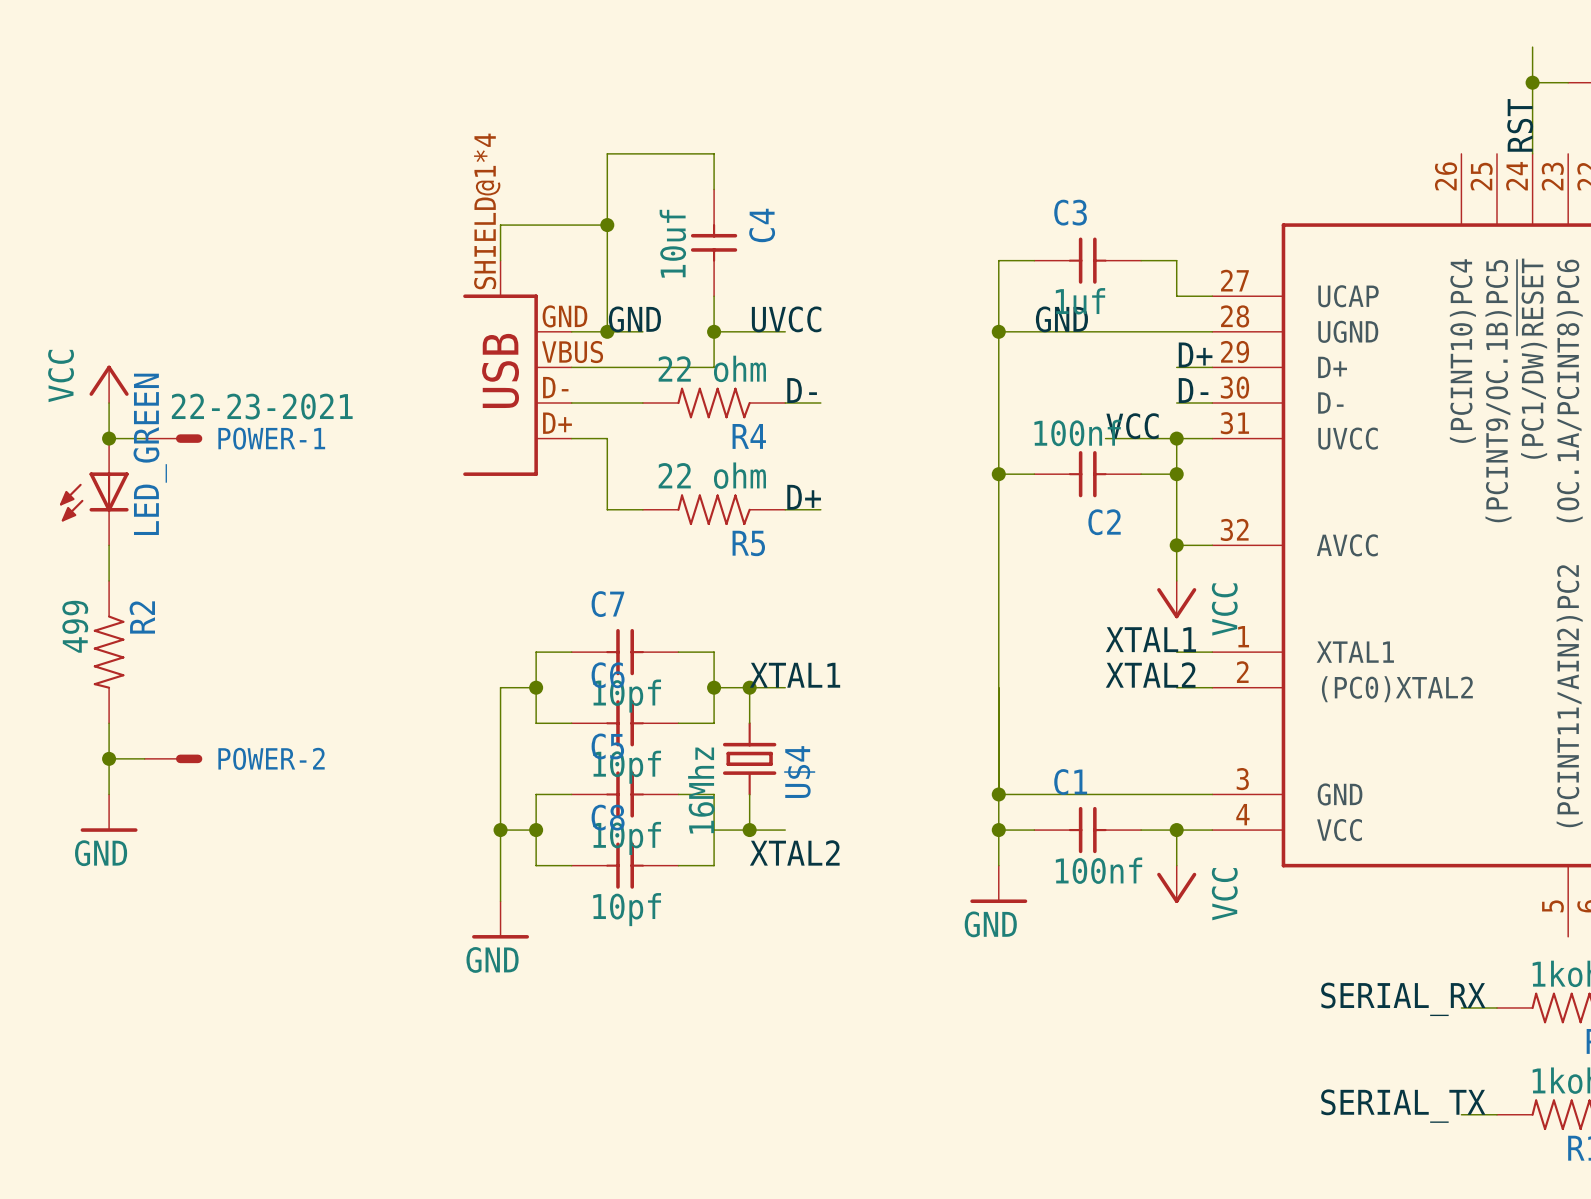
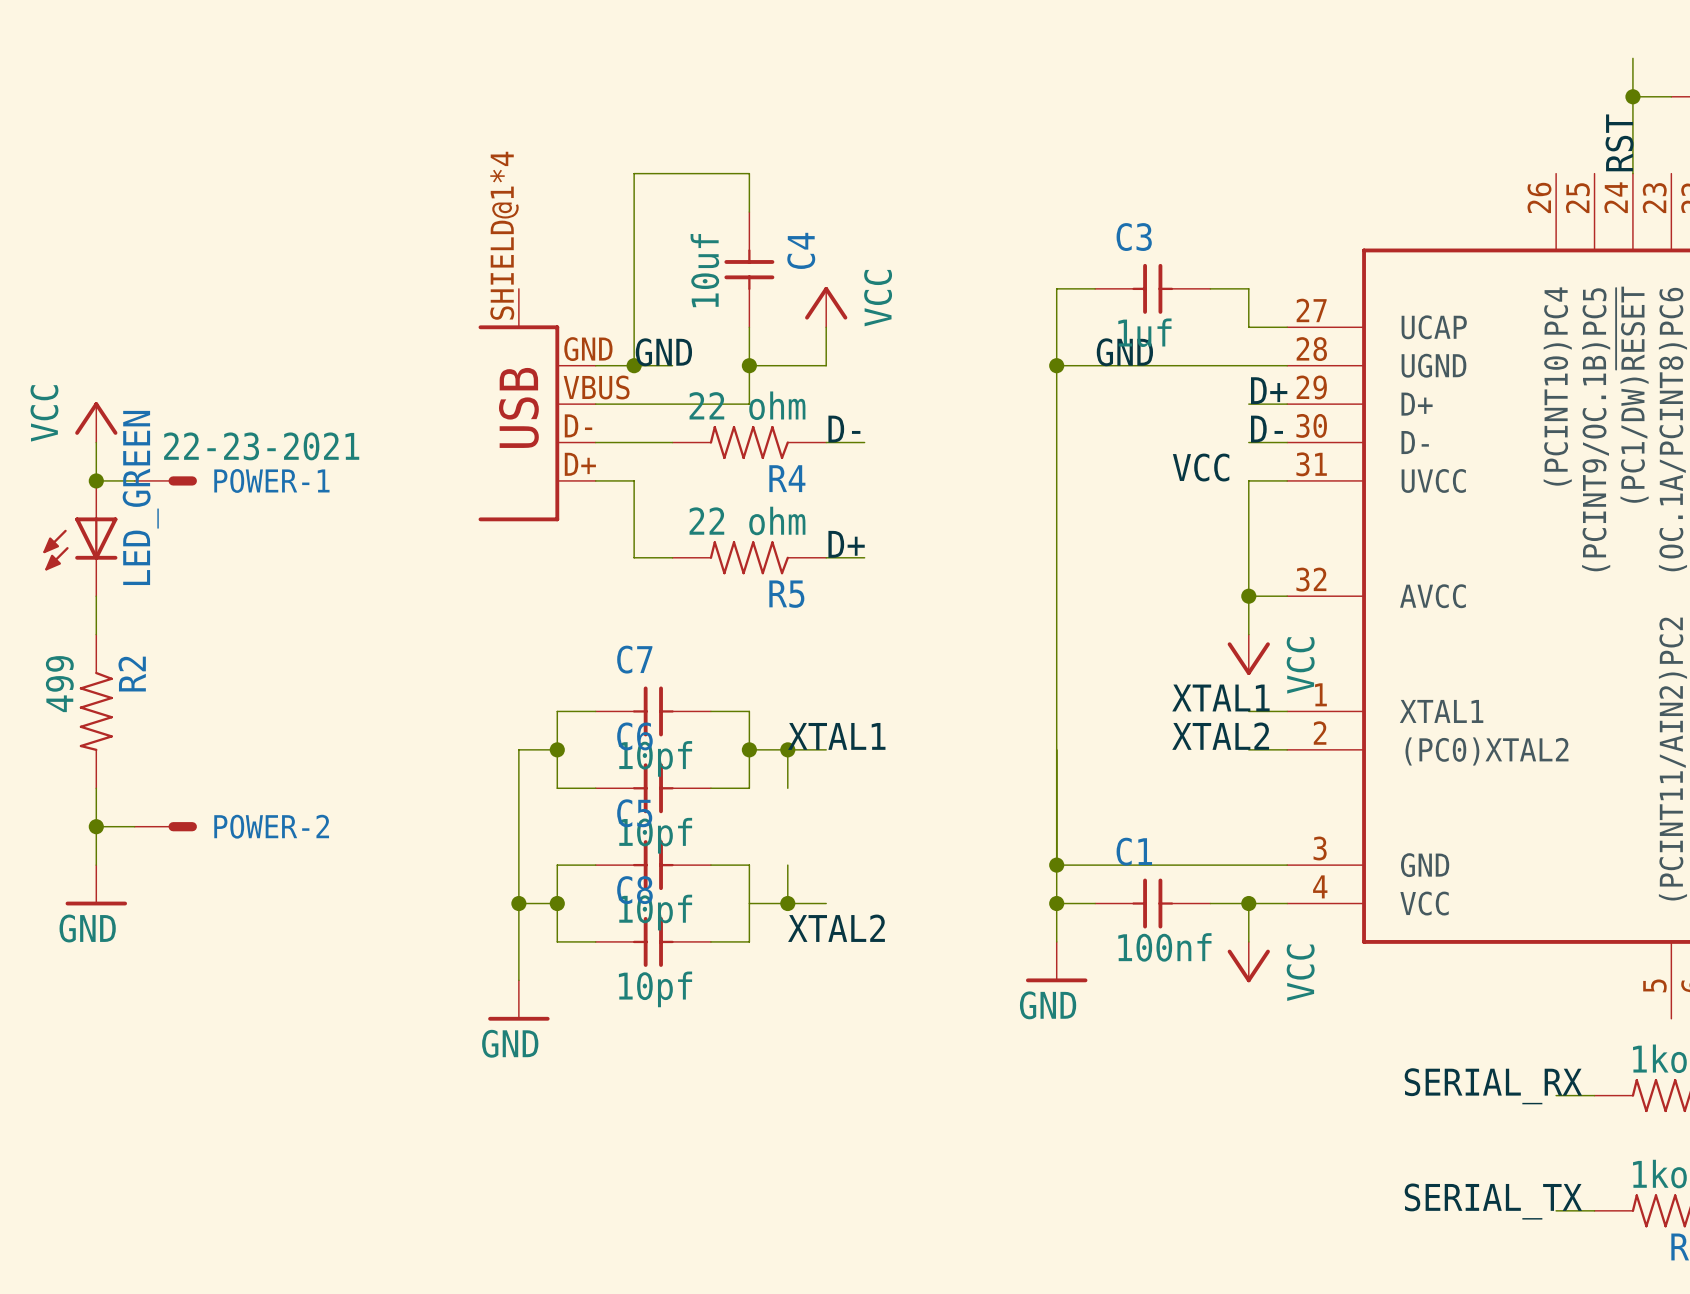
wire: (607, 225) (500, 225) (500, 260) -> none
junction: (607, 225) -> none
power symbol: none -> VCC (826, 307)
wire: none -> (826, 327) (826, 365)
label: UVCC (786, 319) -> none
wire: (1105, 438) (1176, 438) -> none
junction: (1176, 438) -> none
wire: (998, 474) (1034, 474) -> none
junction: (998, 474) -> none
C2: 100nf (1087, 474) -> none
wire: (1141, 474) (1176, 474) -> none
junction: (1176, 474) -> none
U$4: 16Mhz (749, 758) -> none

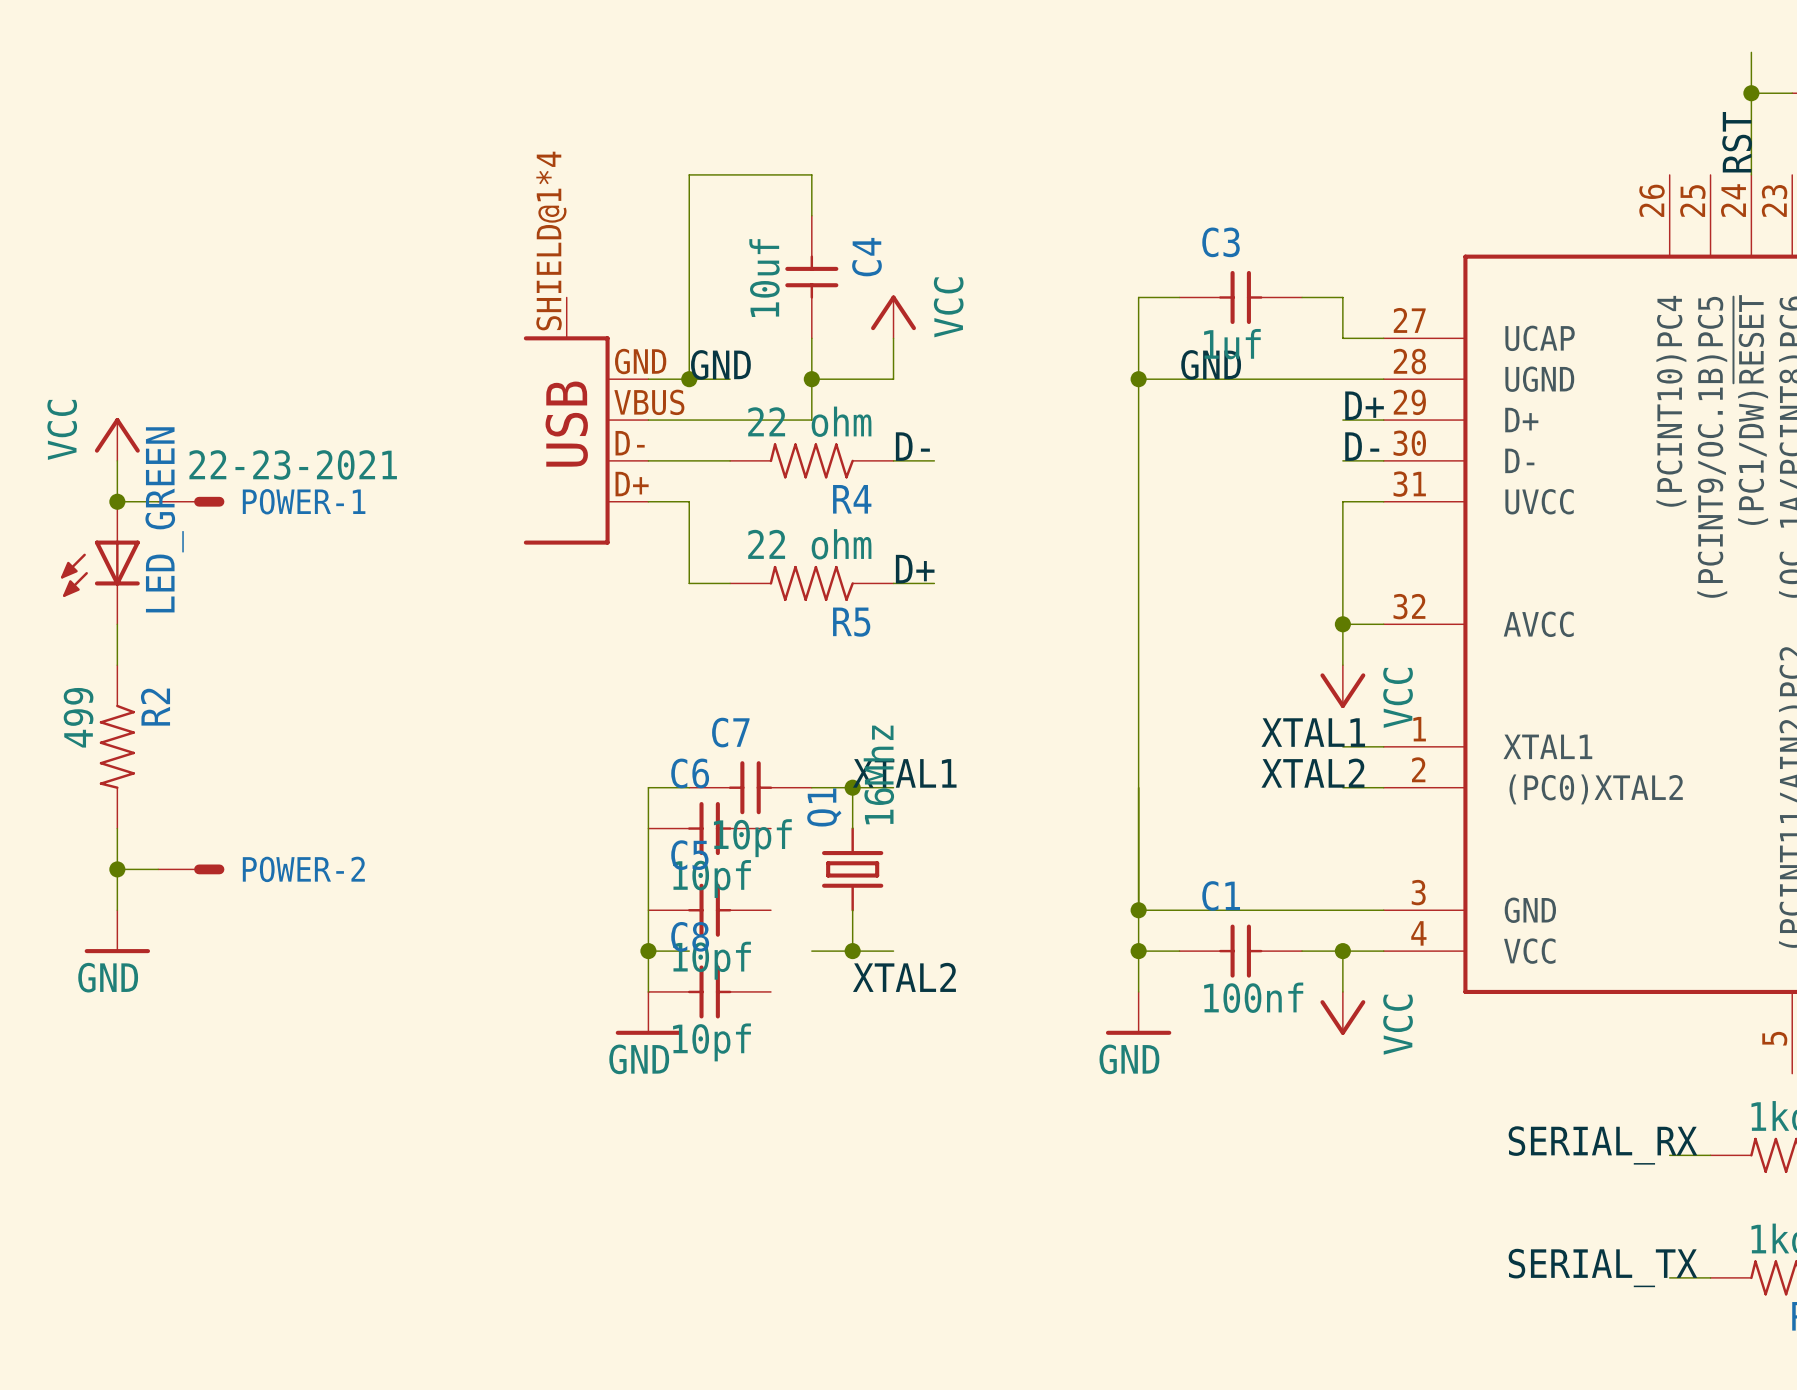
label: VCC (1201, 467) -> none
wire: (595, 711) (557, 711) (557, 788) (595, 788) -> none
C7 position: (653, 711) -> (750, 787)
wire: (710, 711) (749, 711) (749, 788) (710, 788) -> none
wire: (557, 749) (518, 749) (518, 980) -> none
junction: (557, 749) -> none
junction: (749, 749) -> none
Q1: none -> 16Mhz (852, 869)
wire: (595, 865) (557, 865) (557, 941) (595, 941) -> (689, 787) (648, 787) (648, 991)
wire: (710, 865) (749, 865) (749, 941) (710, 941) -> none
wire: (518, 903) (557, 903) -> (648, 951) (689, 951)
junction: (518, 903) -> none
junction: (557, 903) -> none
junction: none -> (648, 951)
power symbol position: GND (518, 1000) -> GND (648, 1013)

